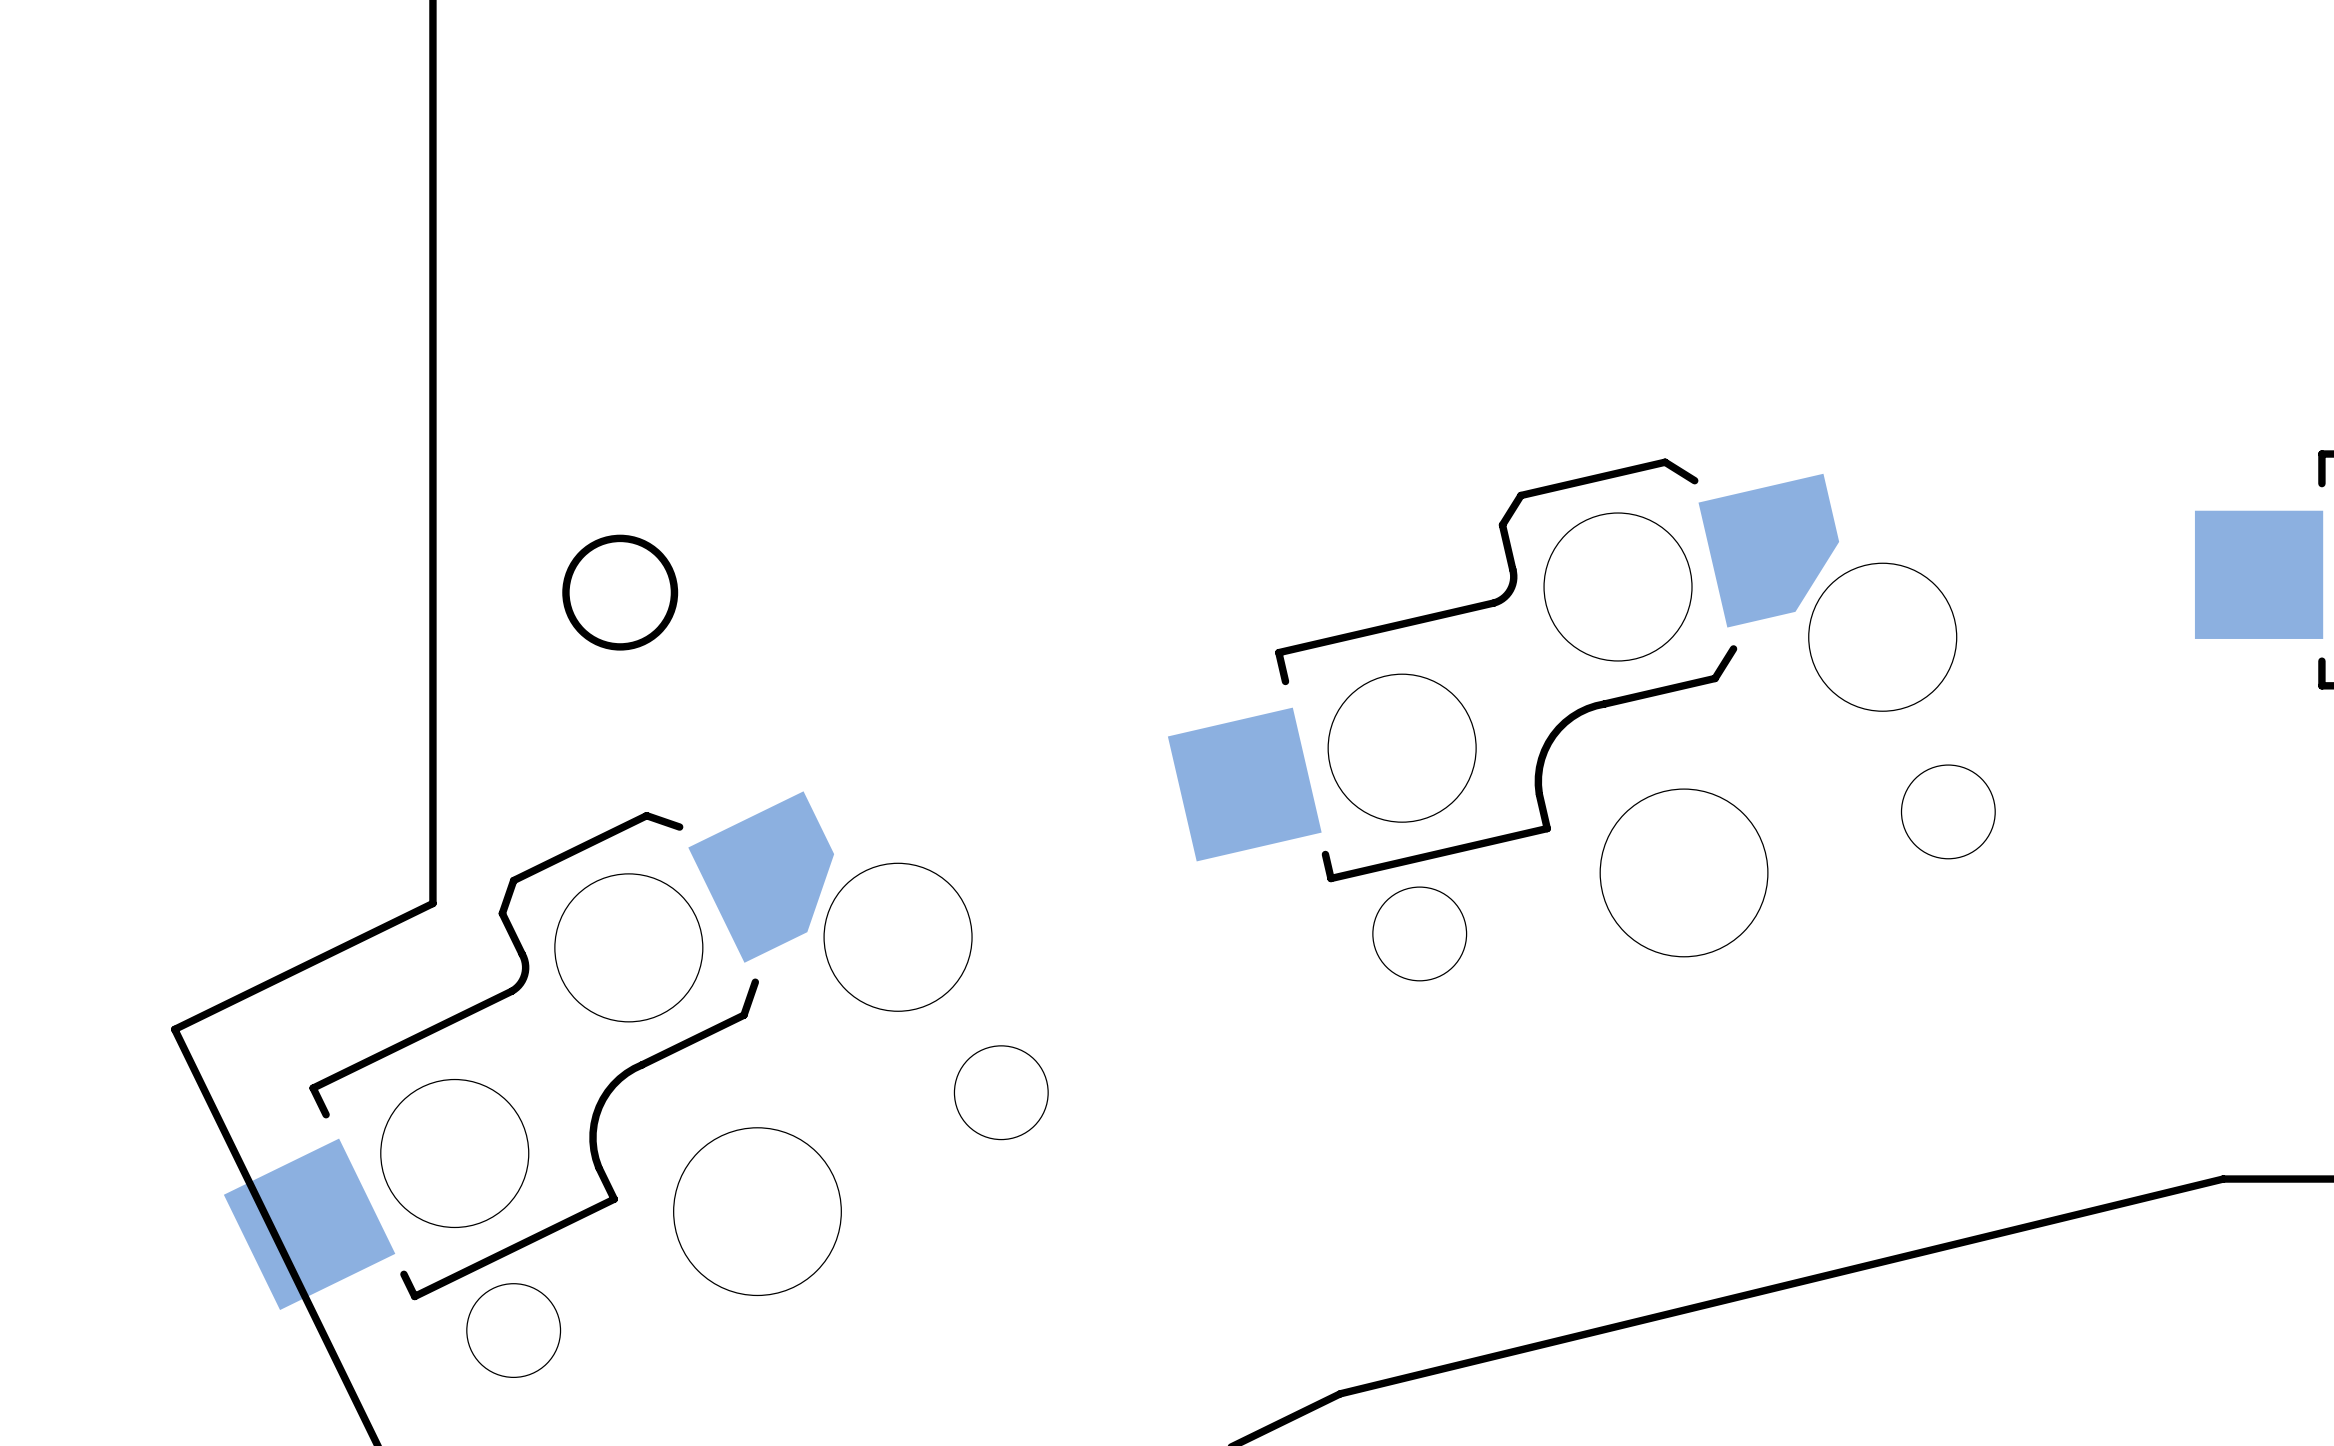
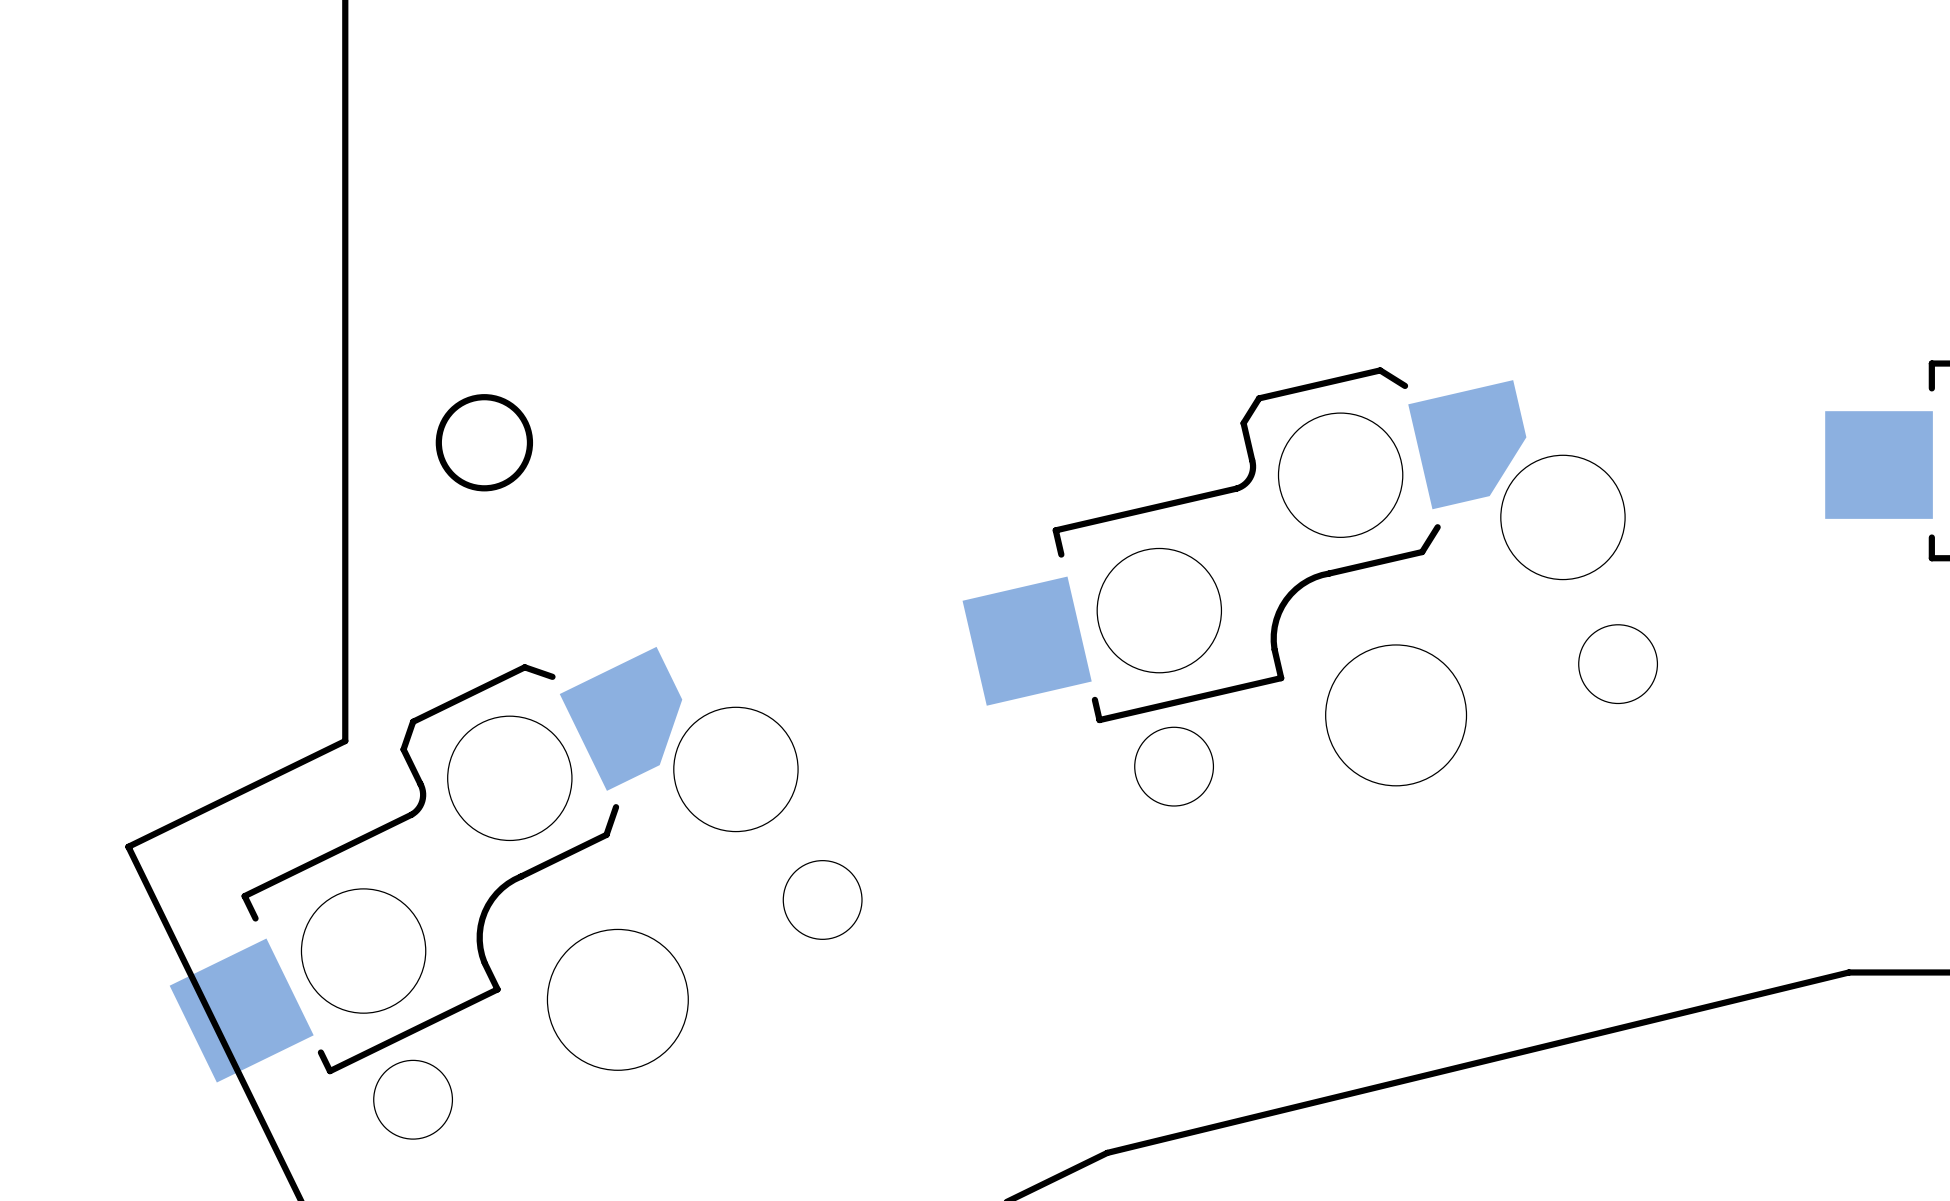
round board edge position: (620, 592) -> (484, 442)

